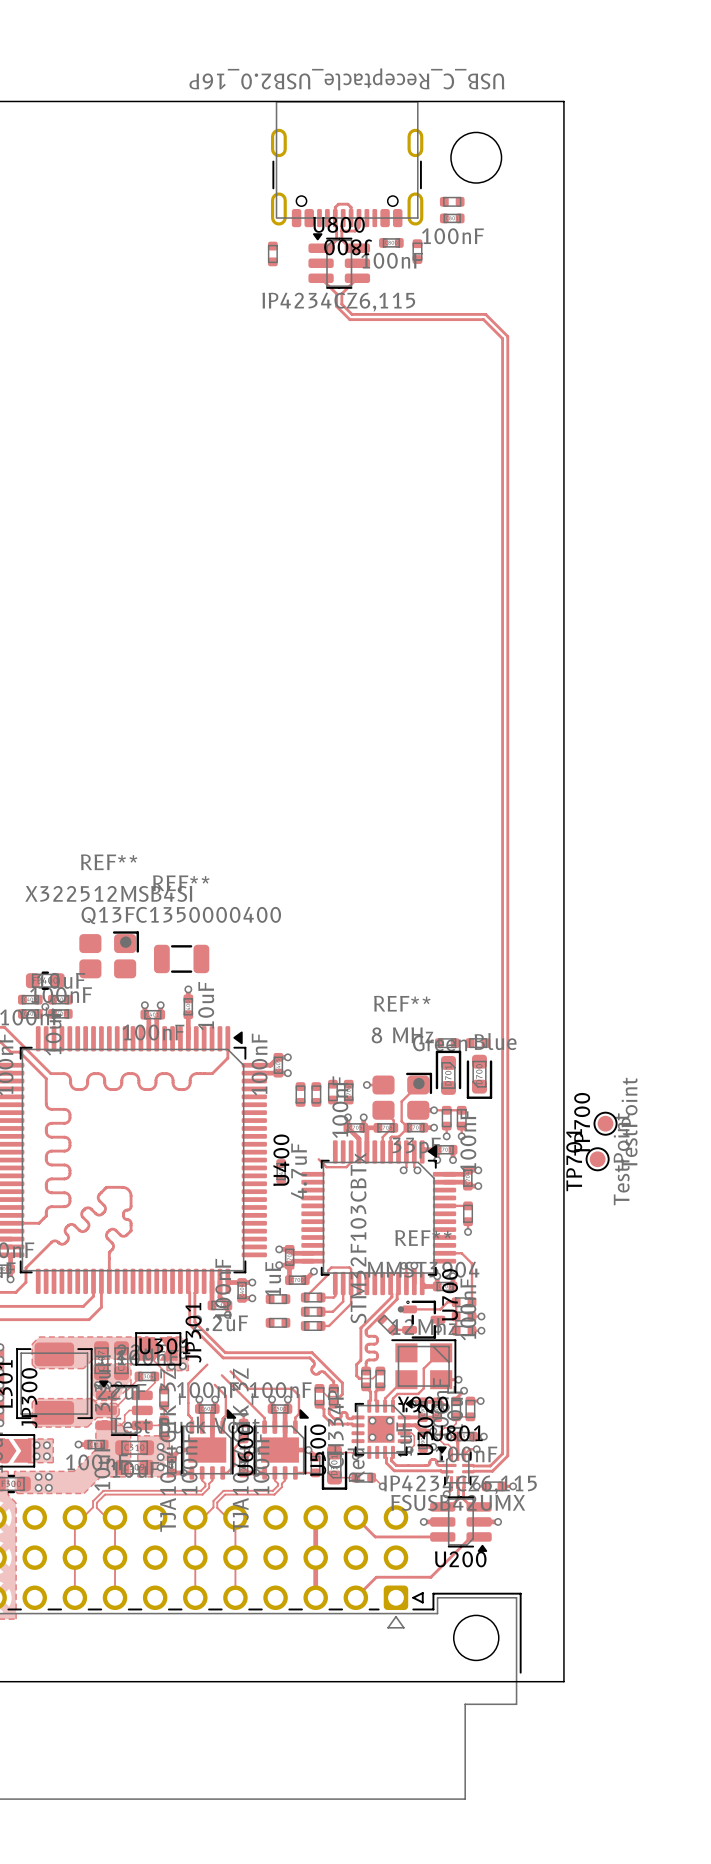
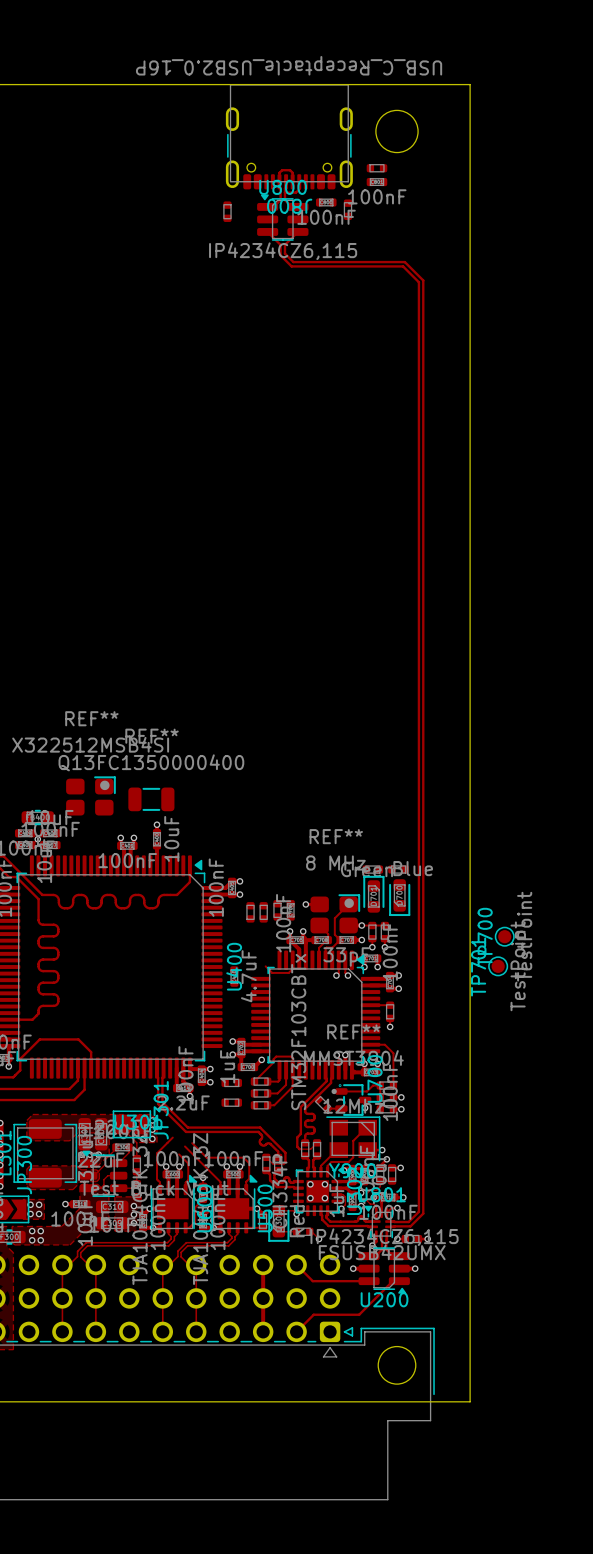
track: (109, 1262) (109, 1252) (113, 1245) (106, 1237) (107, 1232) (113, 1229) (124, 1236) (131, 1230) (130, 1221) (123, 1215) (124, 1211) (130, 1207) (130, 1194) (128, 1189) (123, 1187) (106, 1187) (98, 1197) (105, 1206) (104, 1211) (98, 1215) (89, 1208) (84, 1209) (81, 1215) (88, 1223) (87, 1228) (82, 1231) (73, 1224) (68, 1225) (65, 1230) (68, 1236) (67, 1240) (62, 1244) (55, 1240) (51, 1242) (25, 1267) (24, 1283) -> (91, 1052) (78, 1039) (39, 1039) (20, 1058) (20, 1070)

